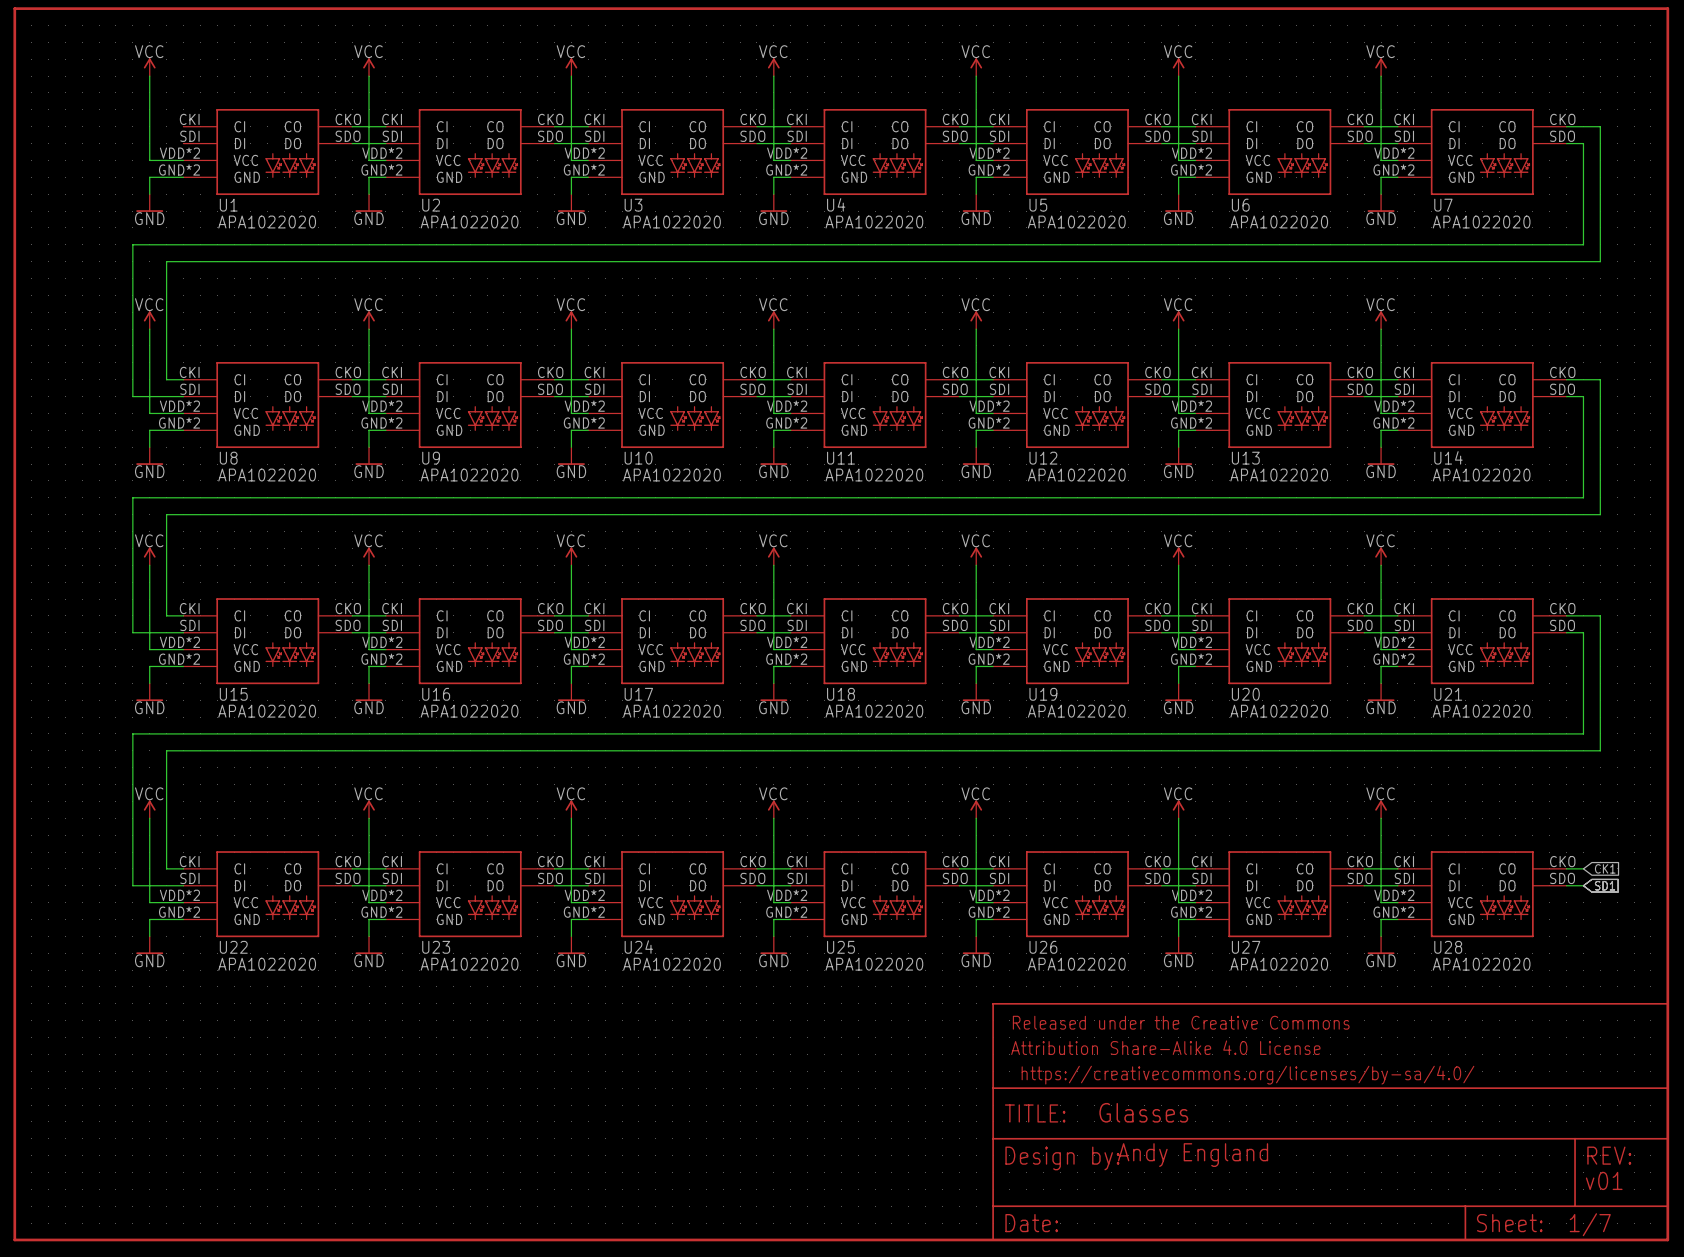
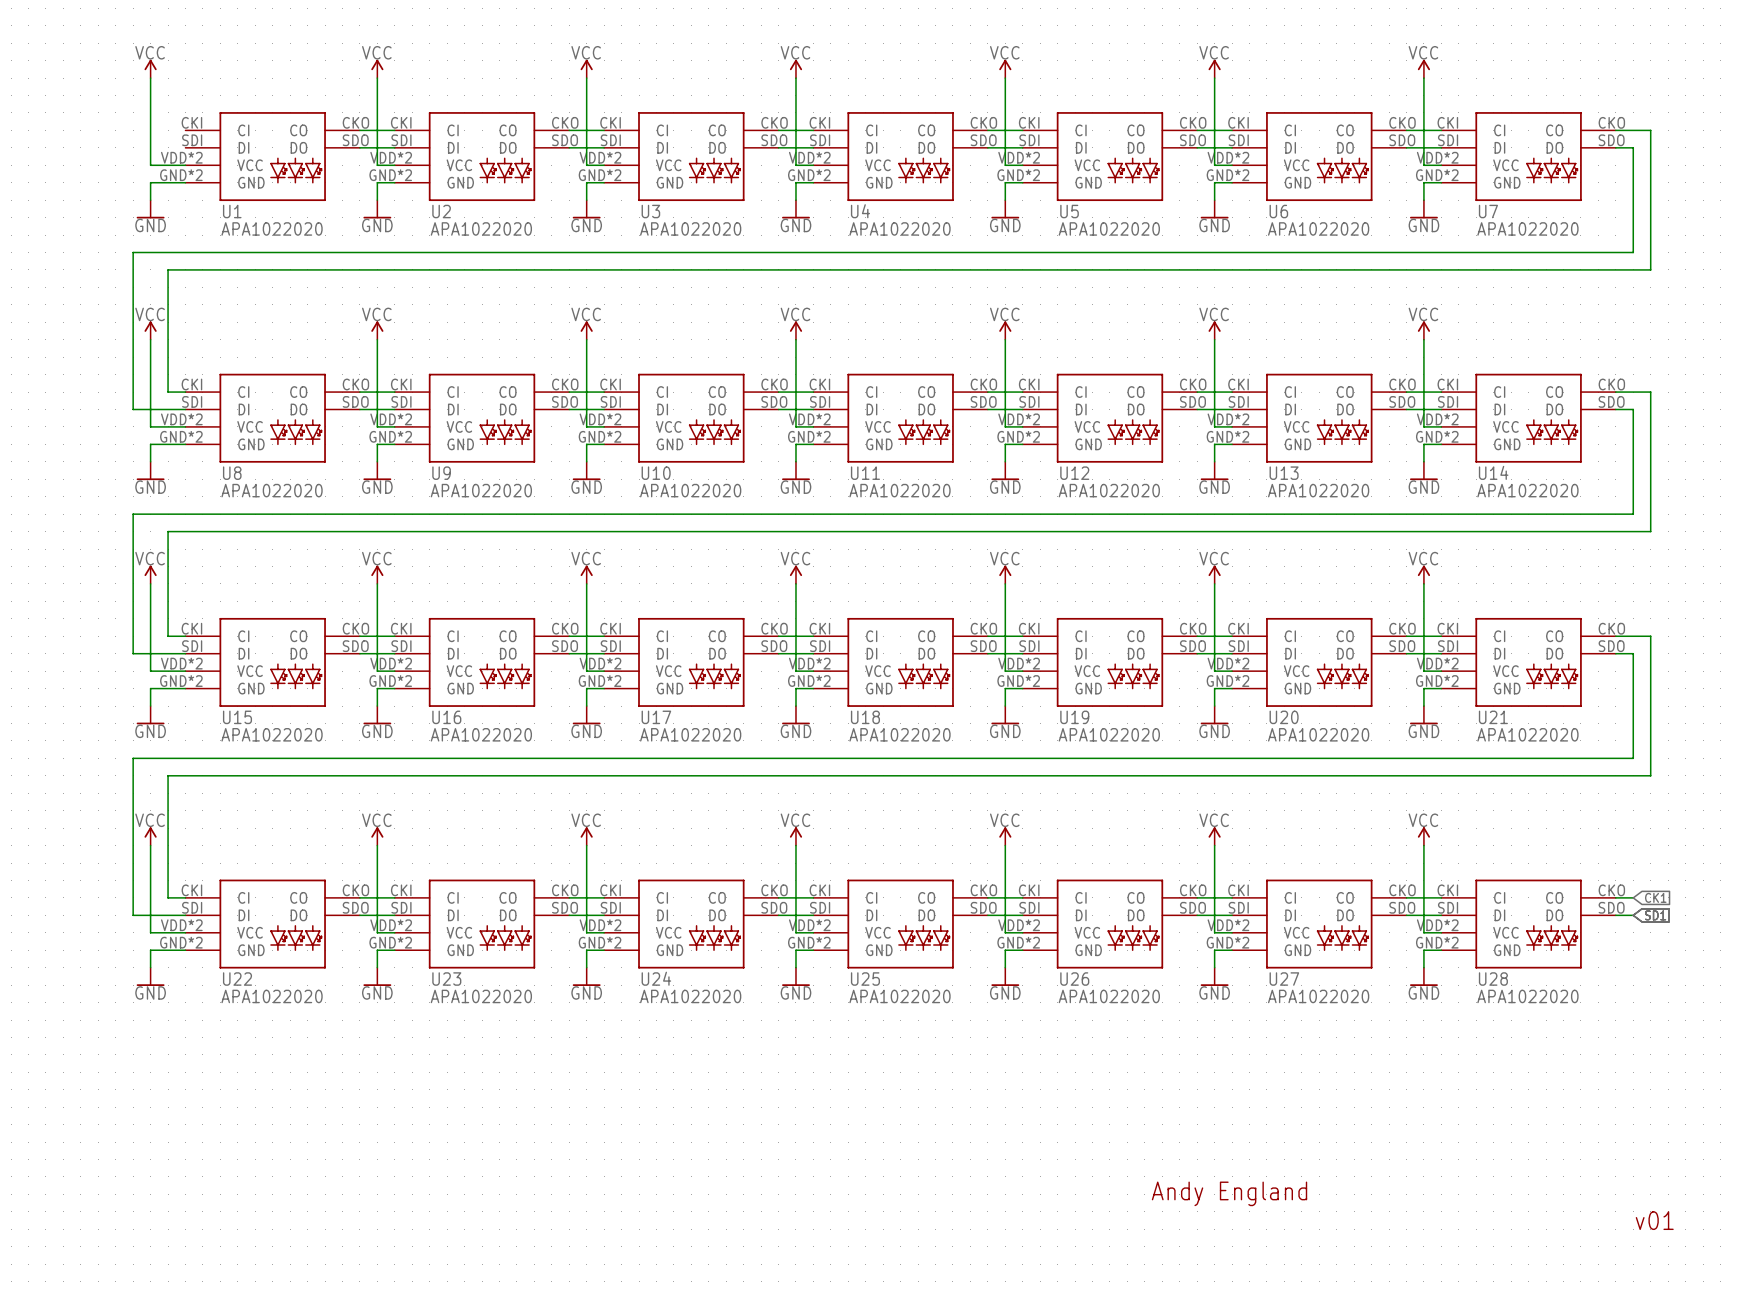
part: (841, 624) -> none
part: (1330, 1121) -> none

